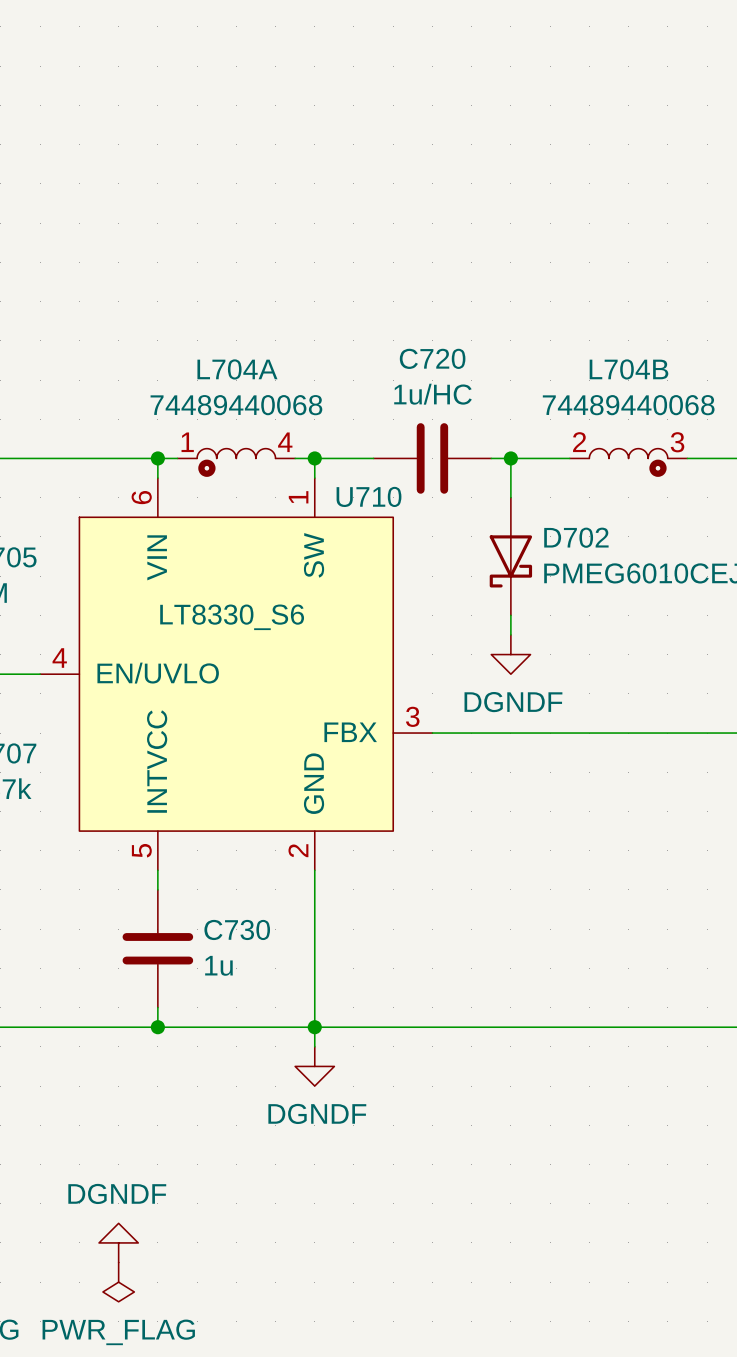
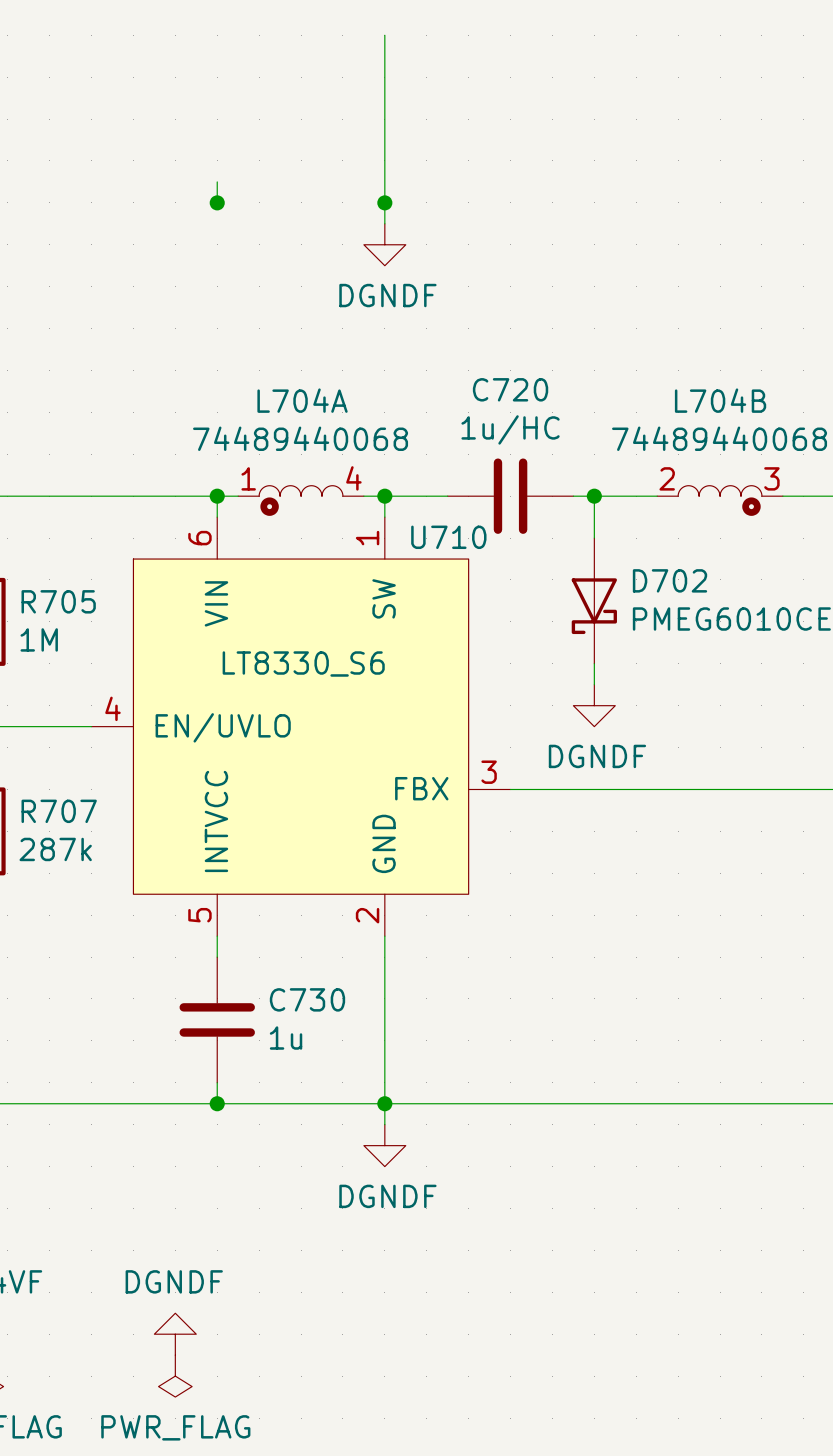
wire: none -> (384, 35) (384, 223)
wire: none -> (217, 181) (217, 202)
junction: none -> (217, 202)
junction: none -> (384, 202)
power symbol: none -> DGNDF (384, 244)

